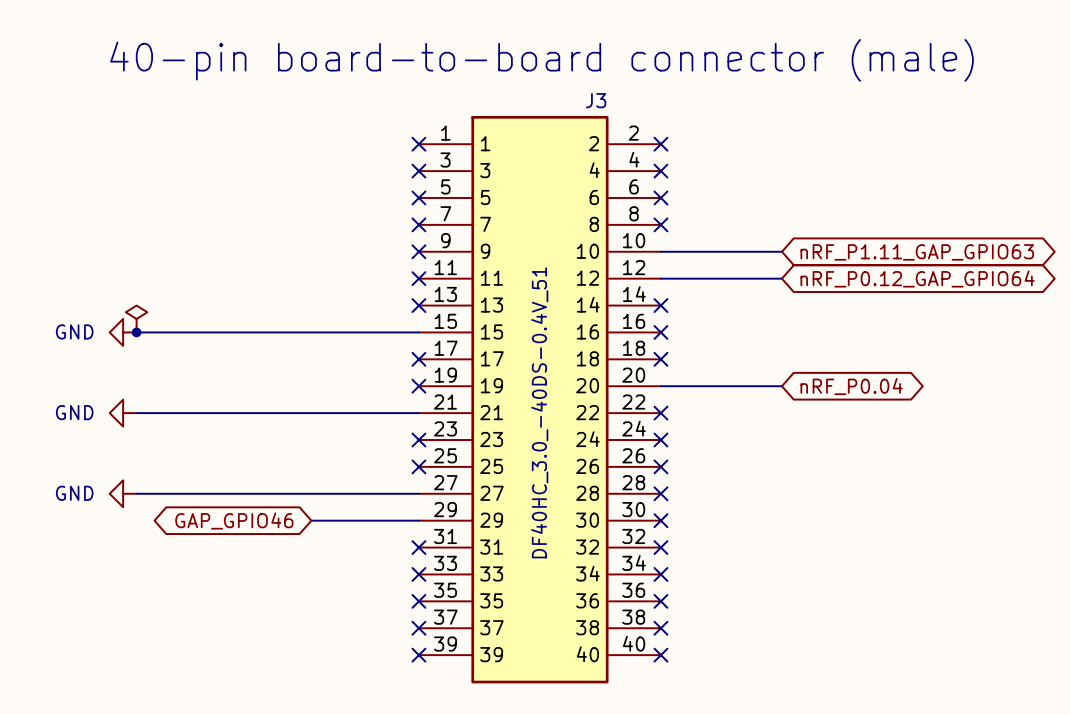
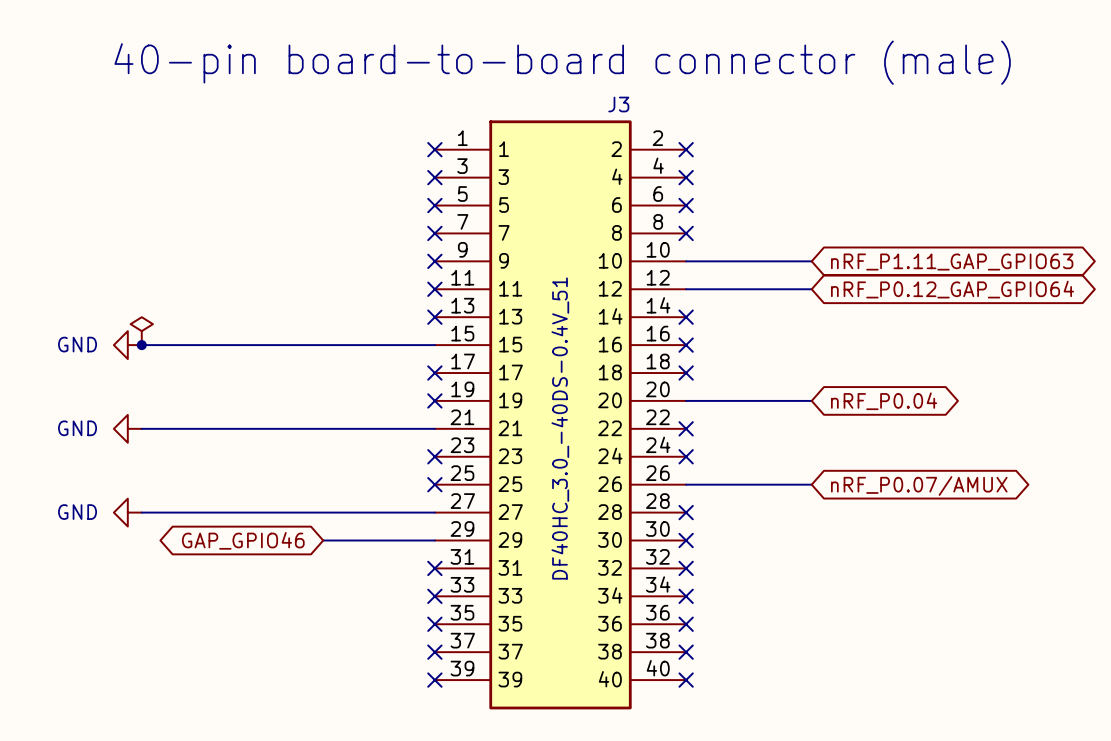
wire: none -> (686, 484) (811, 484)
no-connect mark: (660, 466) -> none
global label: none -> nRF_P0.07/AMUX (919, 486)

